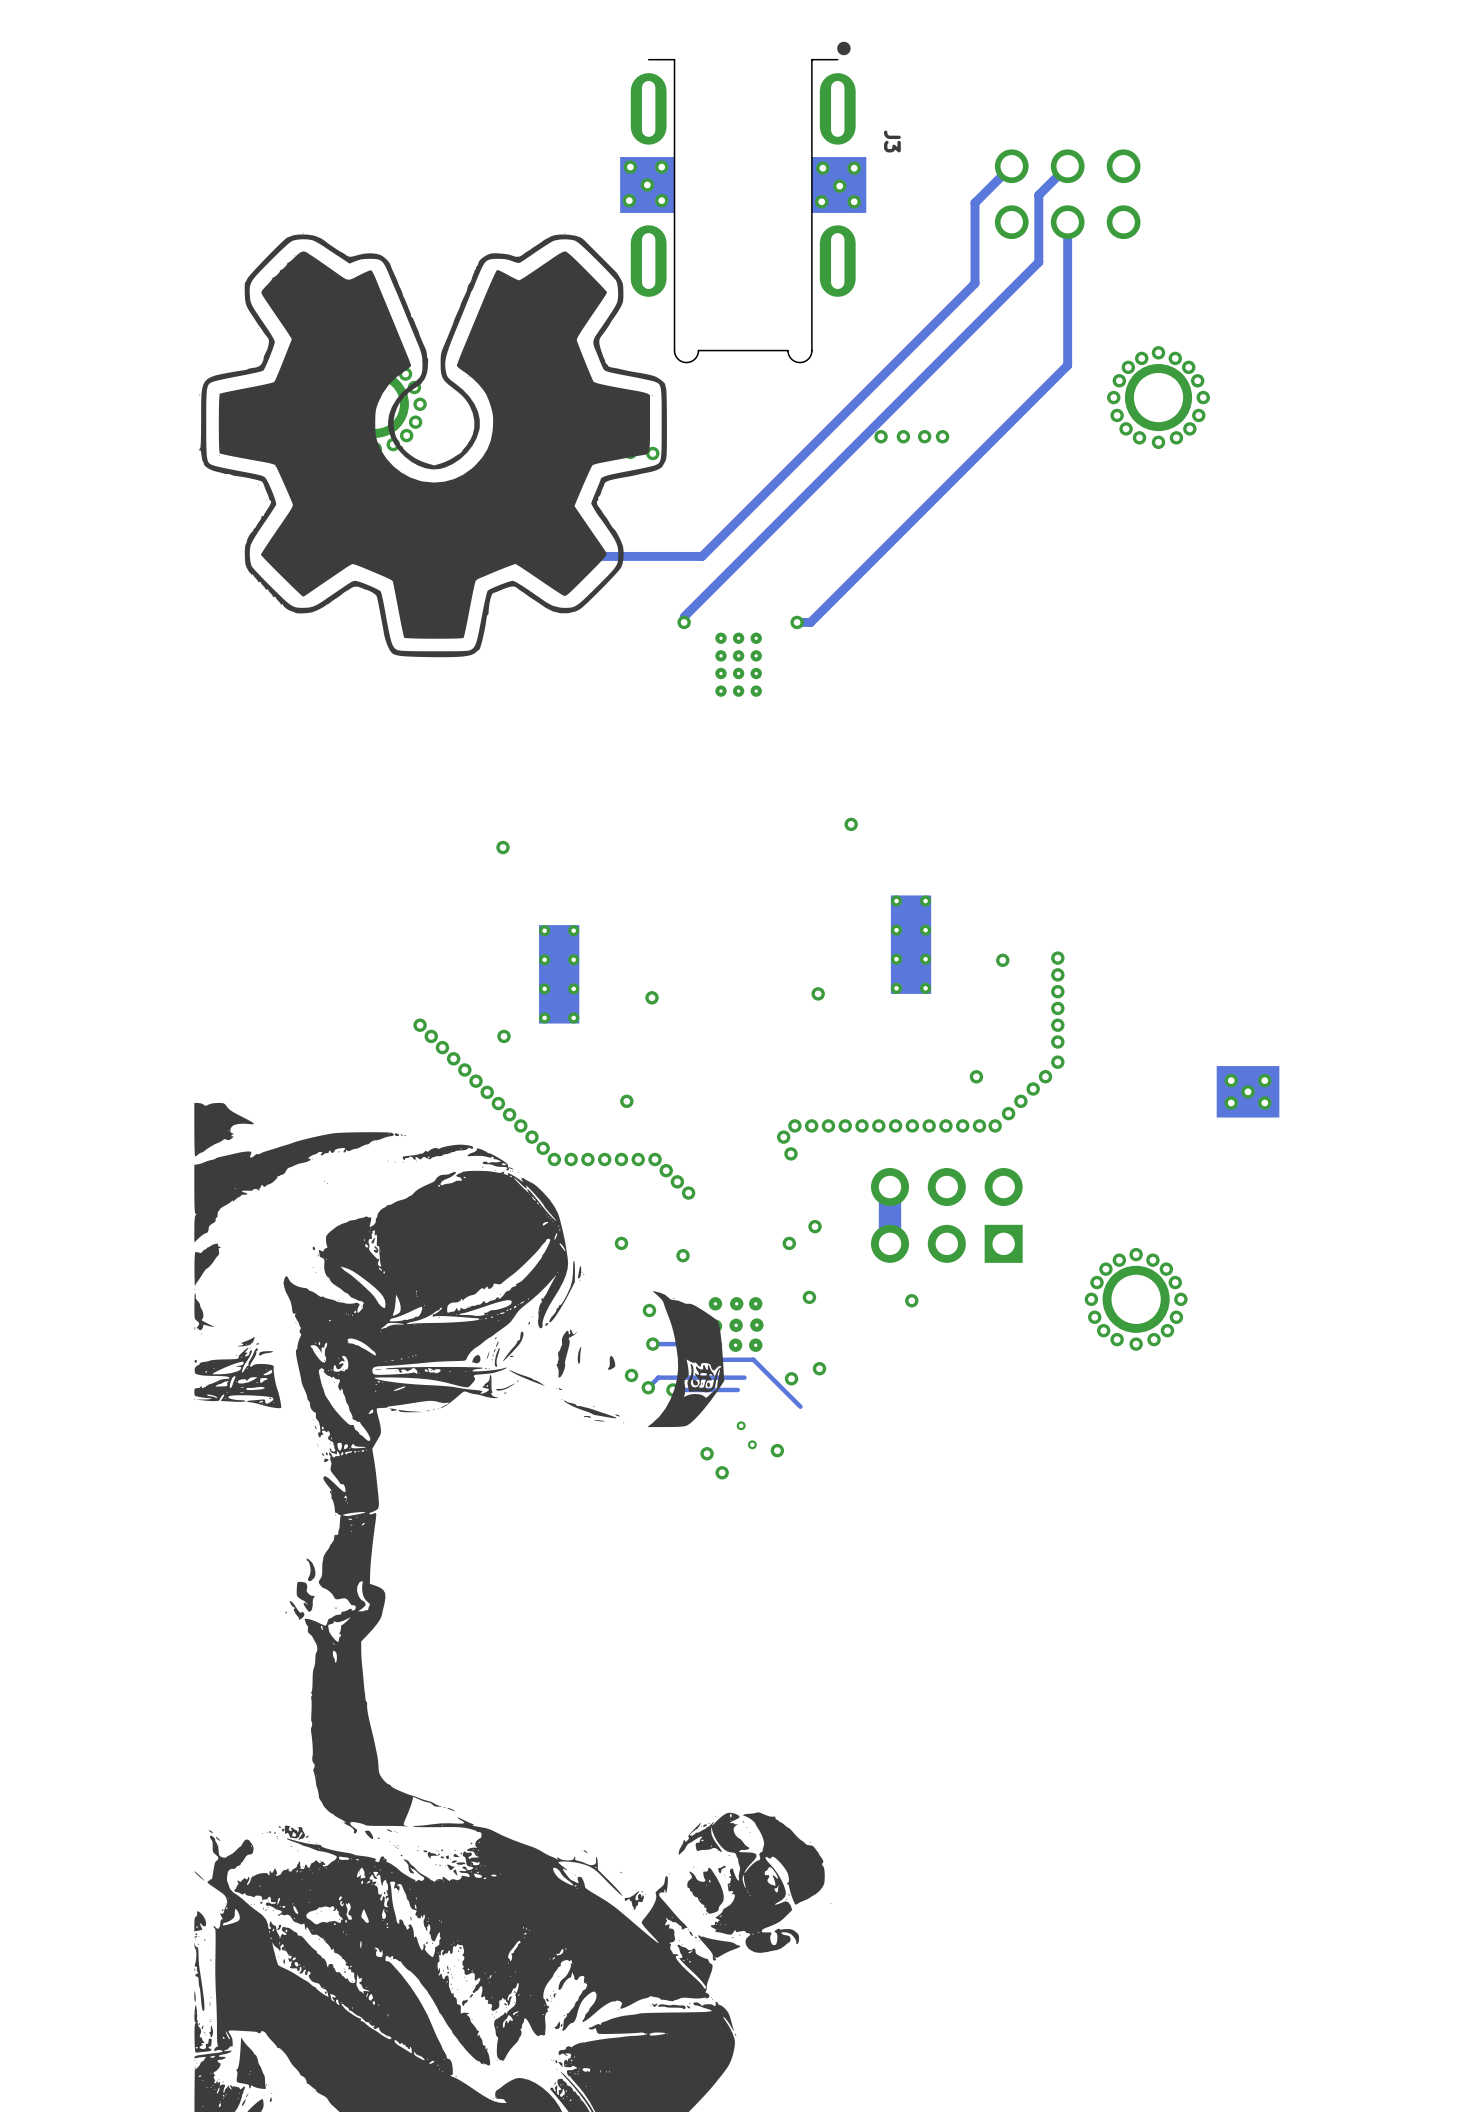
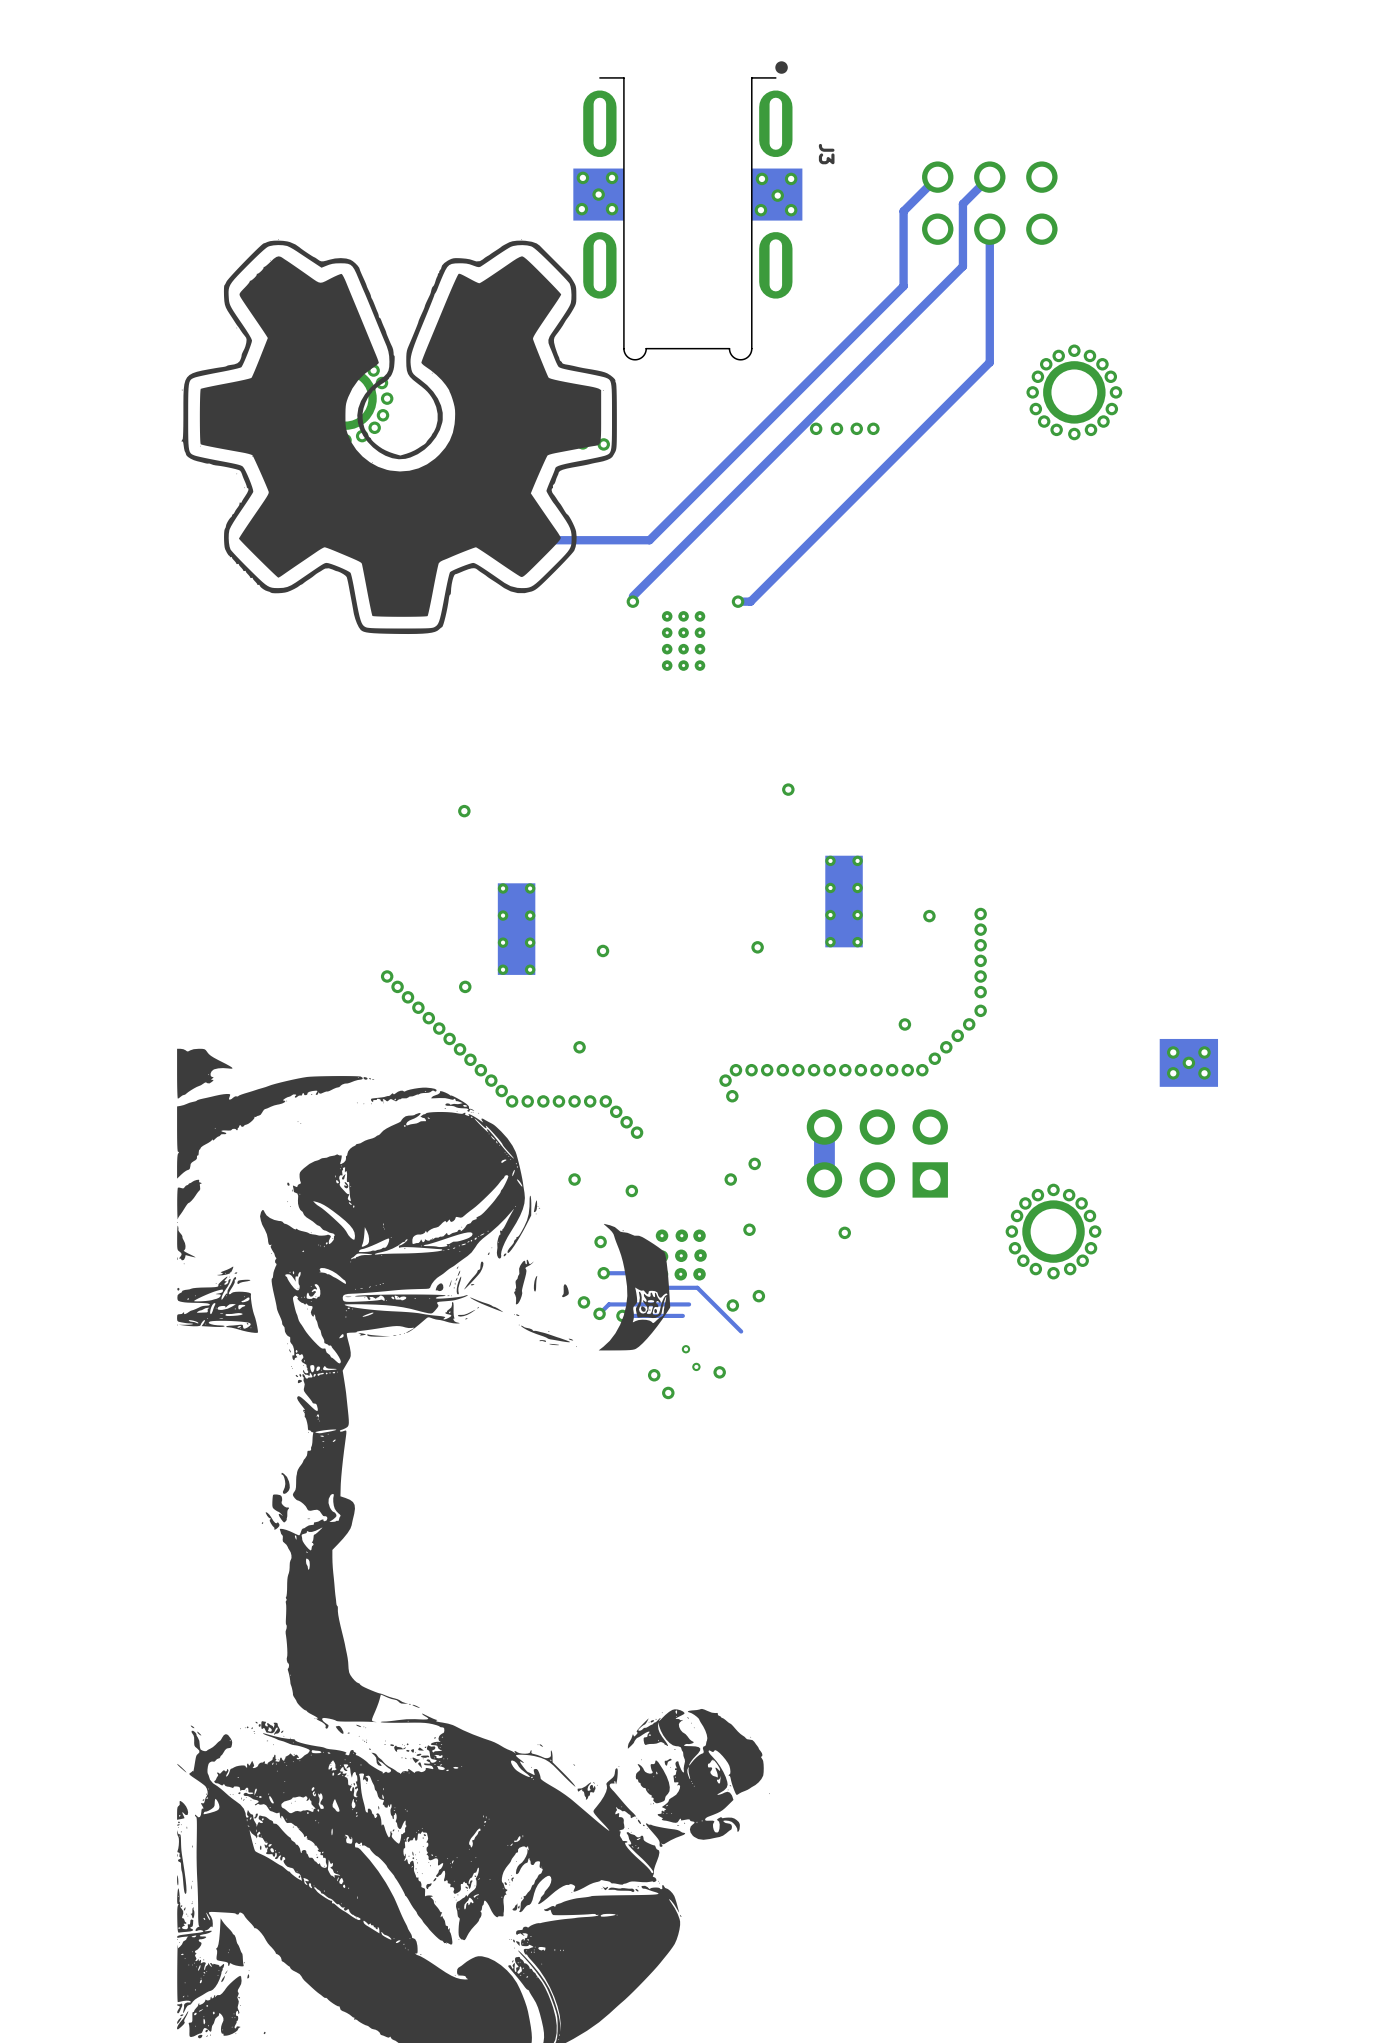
part position: (1248, 1091) -> (1188, 1062)

